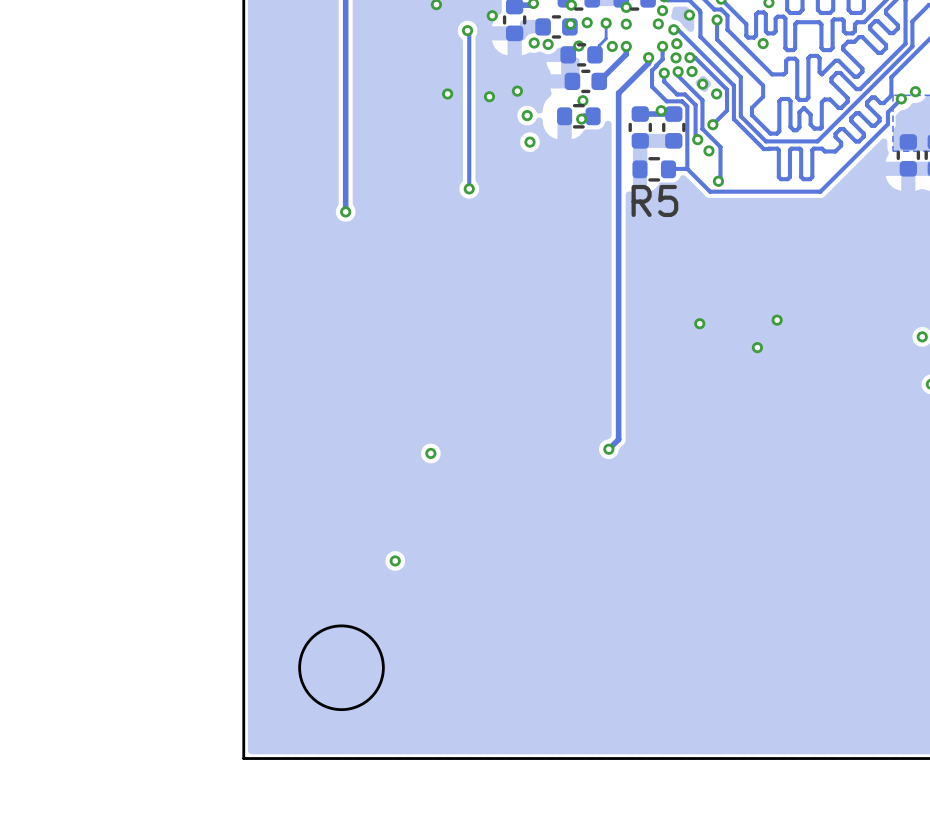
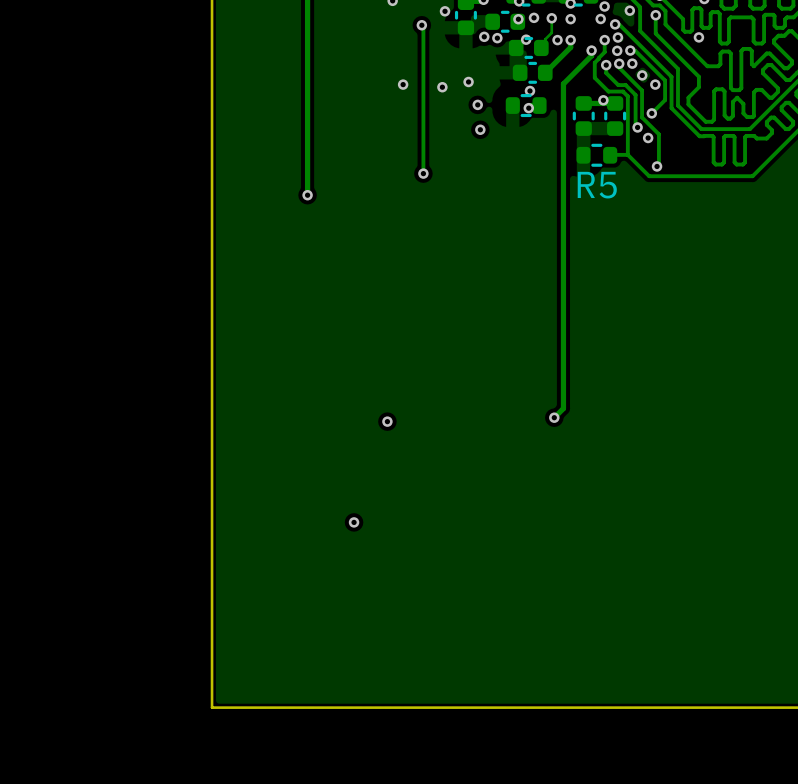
via: (777, 320) -> none
via: (699, 323) -> none
via: (757, 347) -> none
round board edge: [298, 624, 385, 712] -> none

